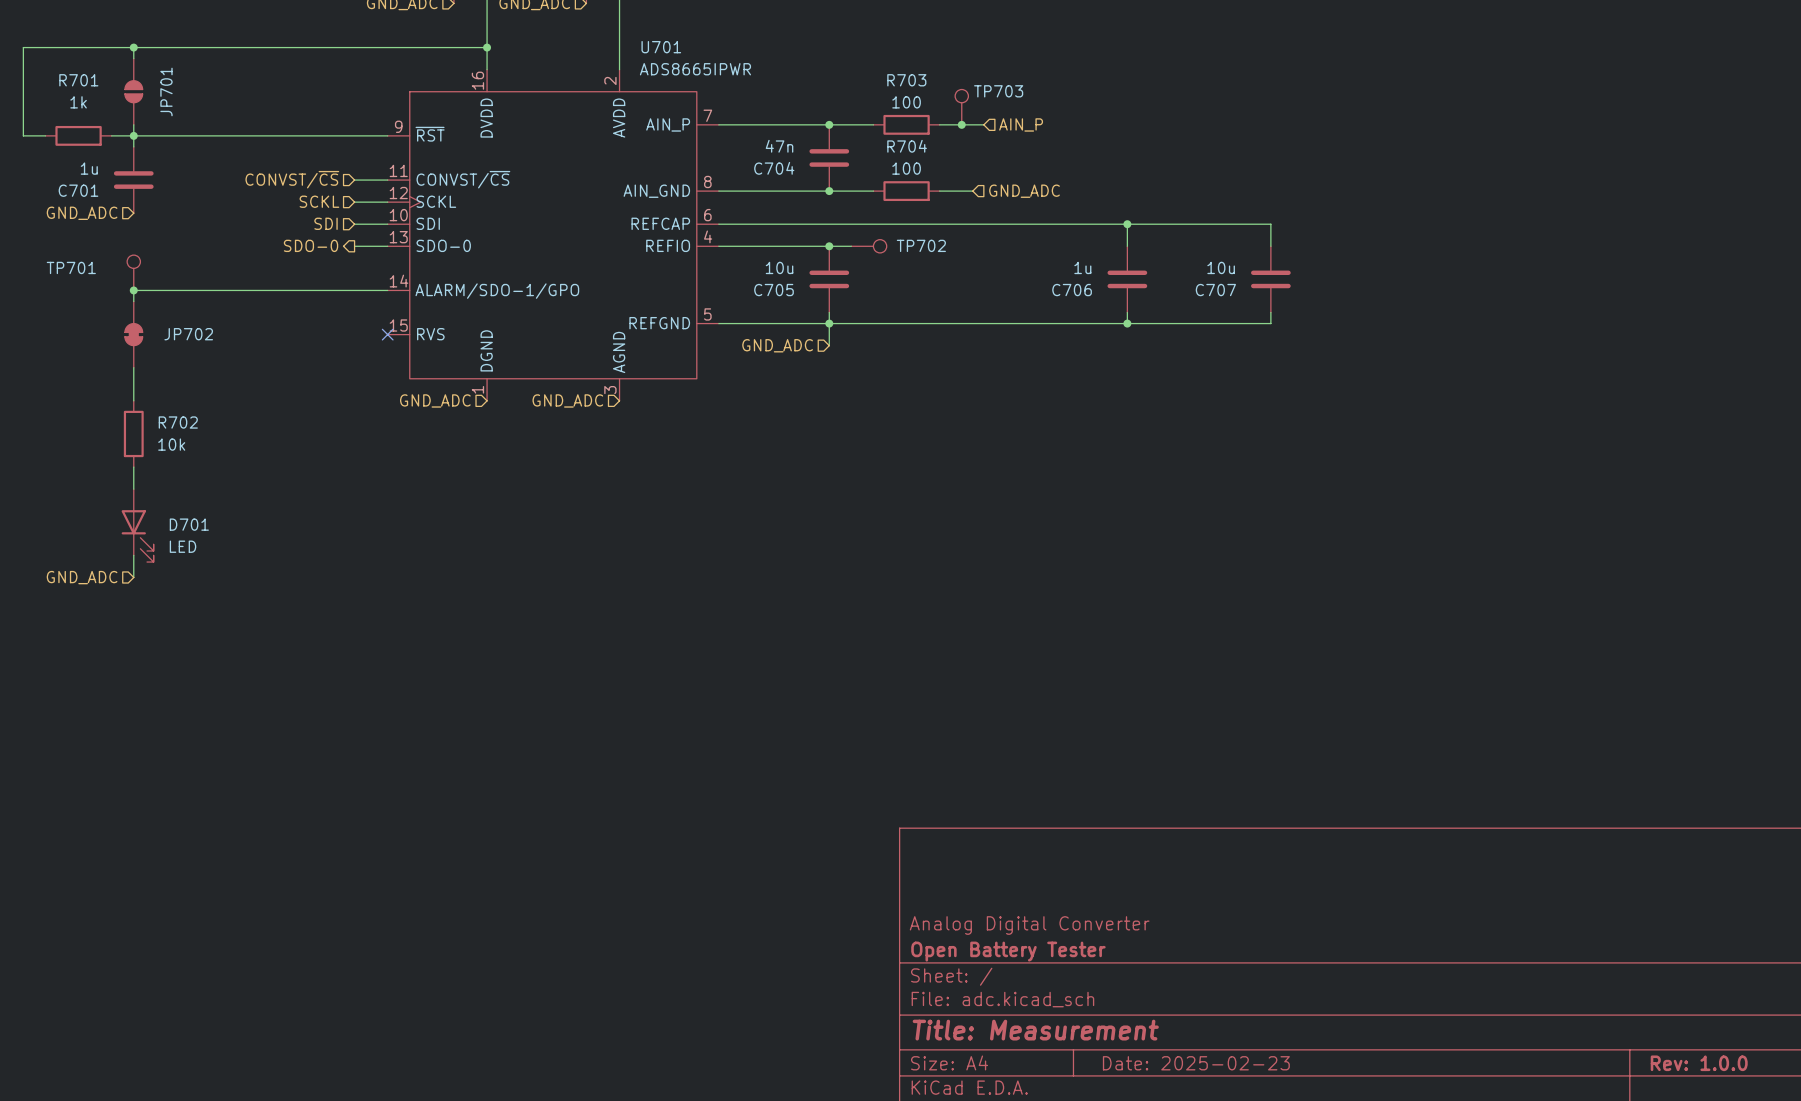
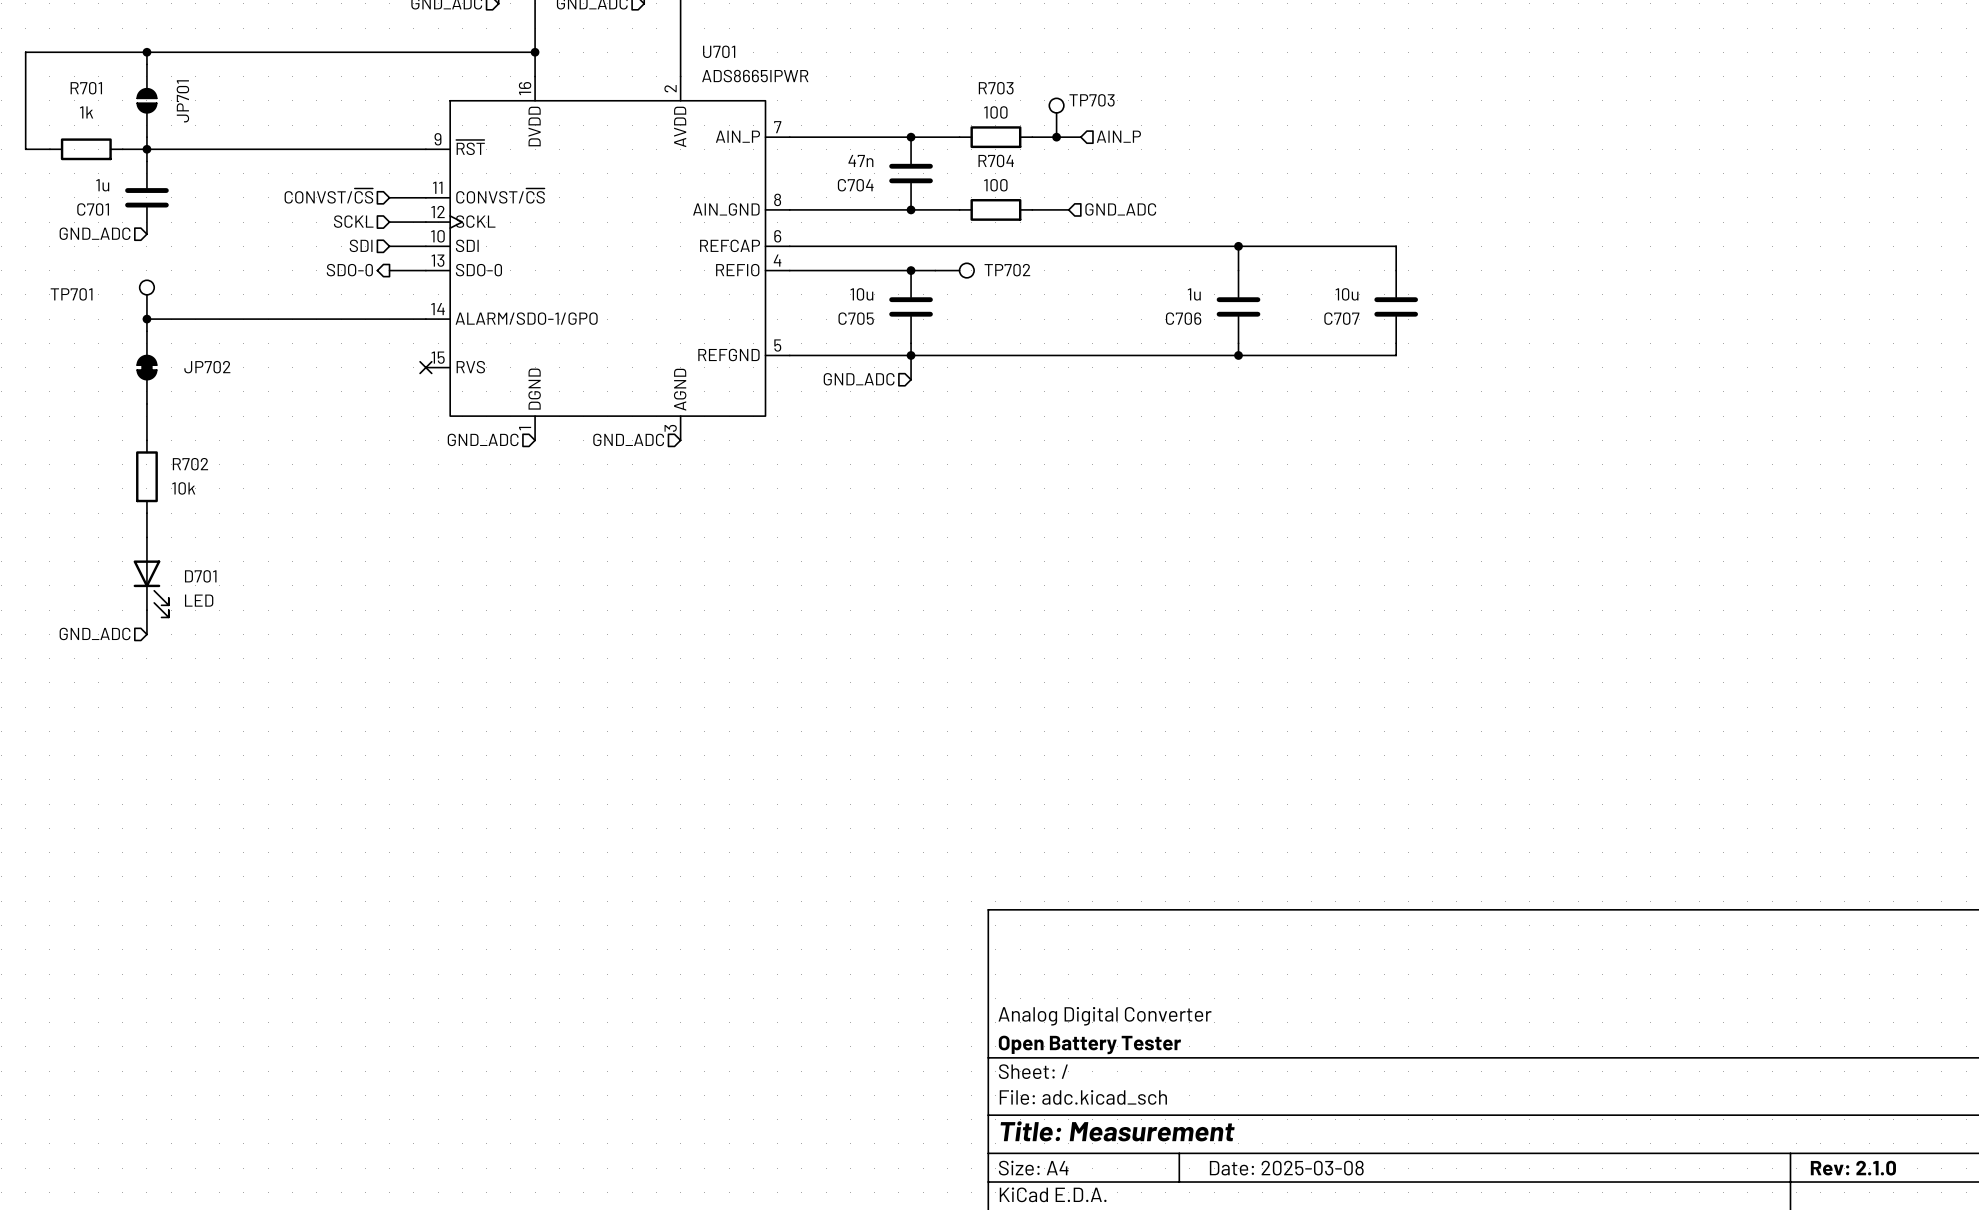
title block: Date: 2025-02-23 (1196, 1063) -> Date: 2025-03-08 (1286, 1168)
title block: Rev: 1.0.0 (1699, 1063) -> Rev: 2.1.0 (1853, 1168)

